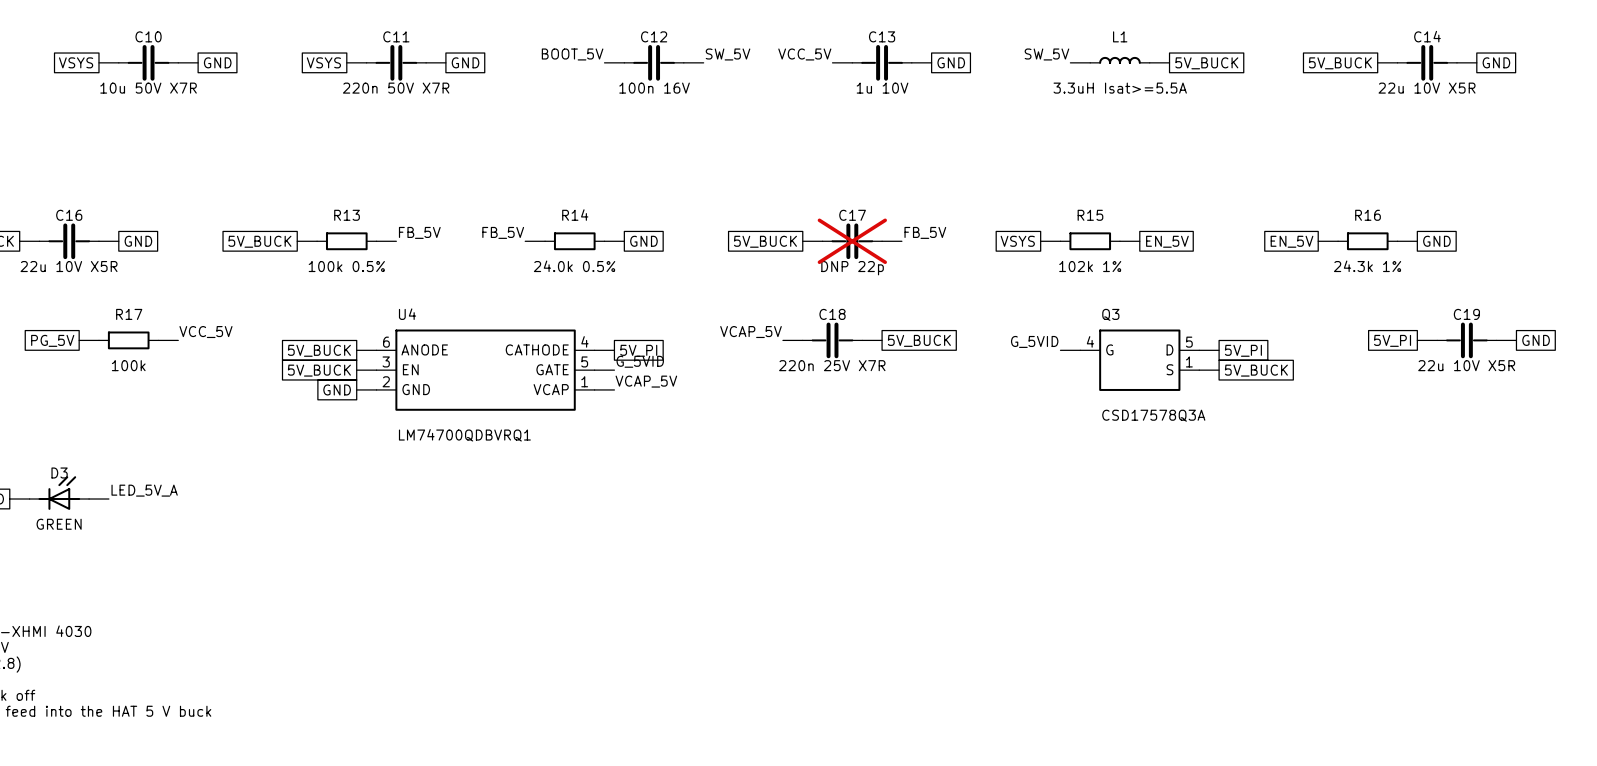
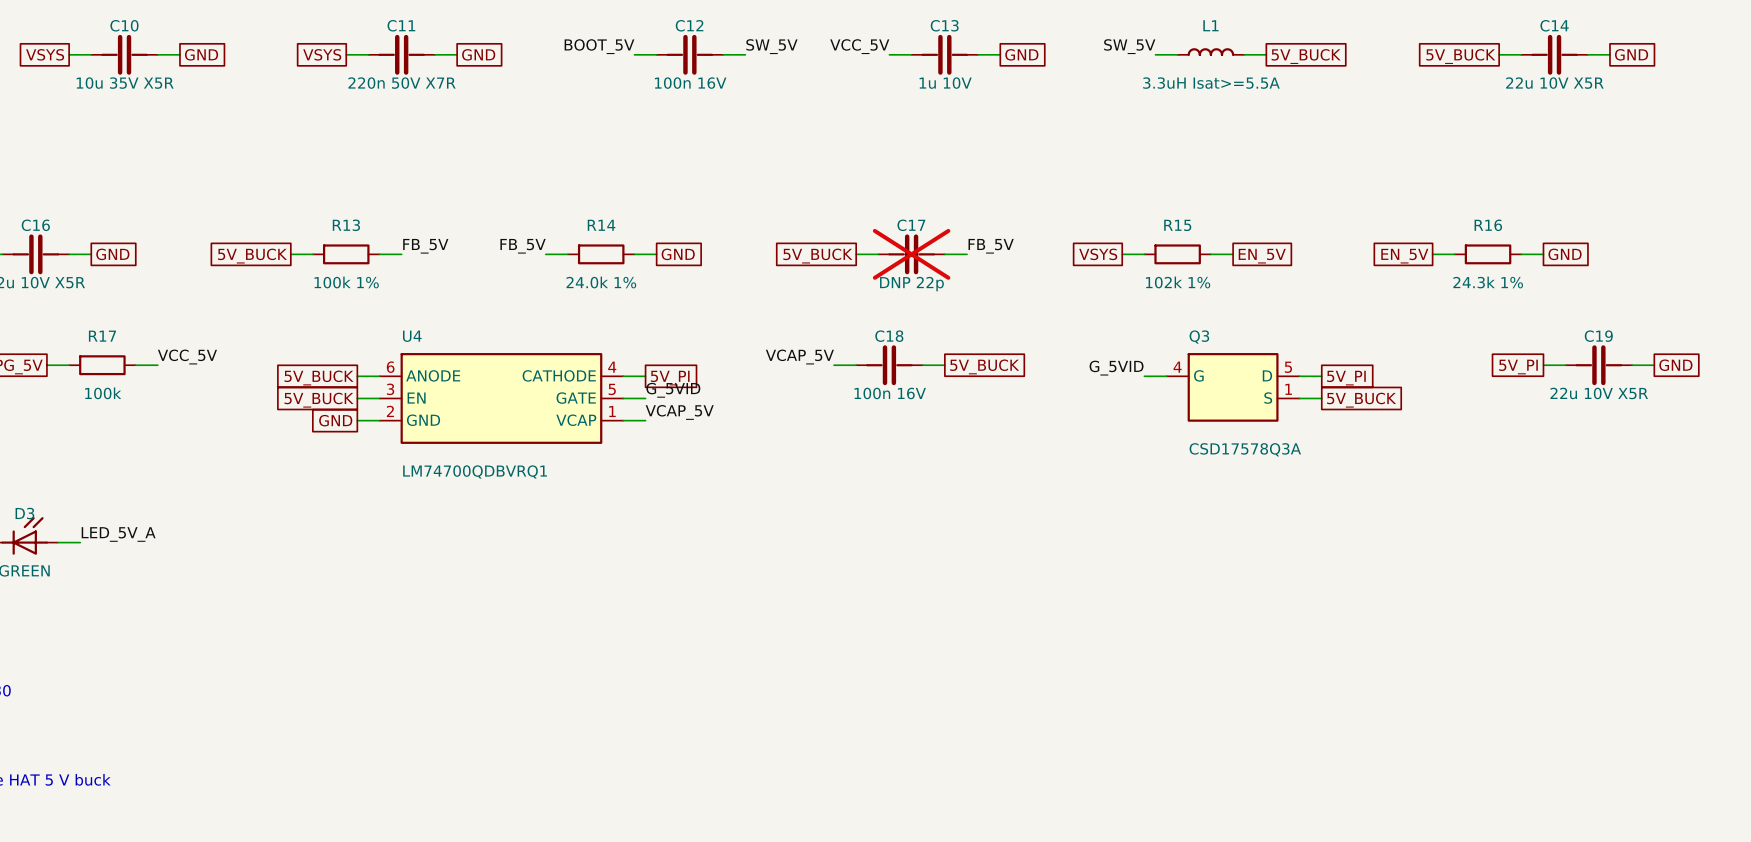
C10 value: 10u 50V X7R (148, 88) -> 10u 35V X5R (125, 83)
R13 value: 100k 0.5% (346, 266) -> 100k 1% (346, 282)
R14 value: 24.0k 0.5% (574, 266) -> 24.0k 1% (601, 282)
C18 value: 220n 25V X7R (832, 365) -> 100n 16V (890, 393)

